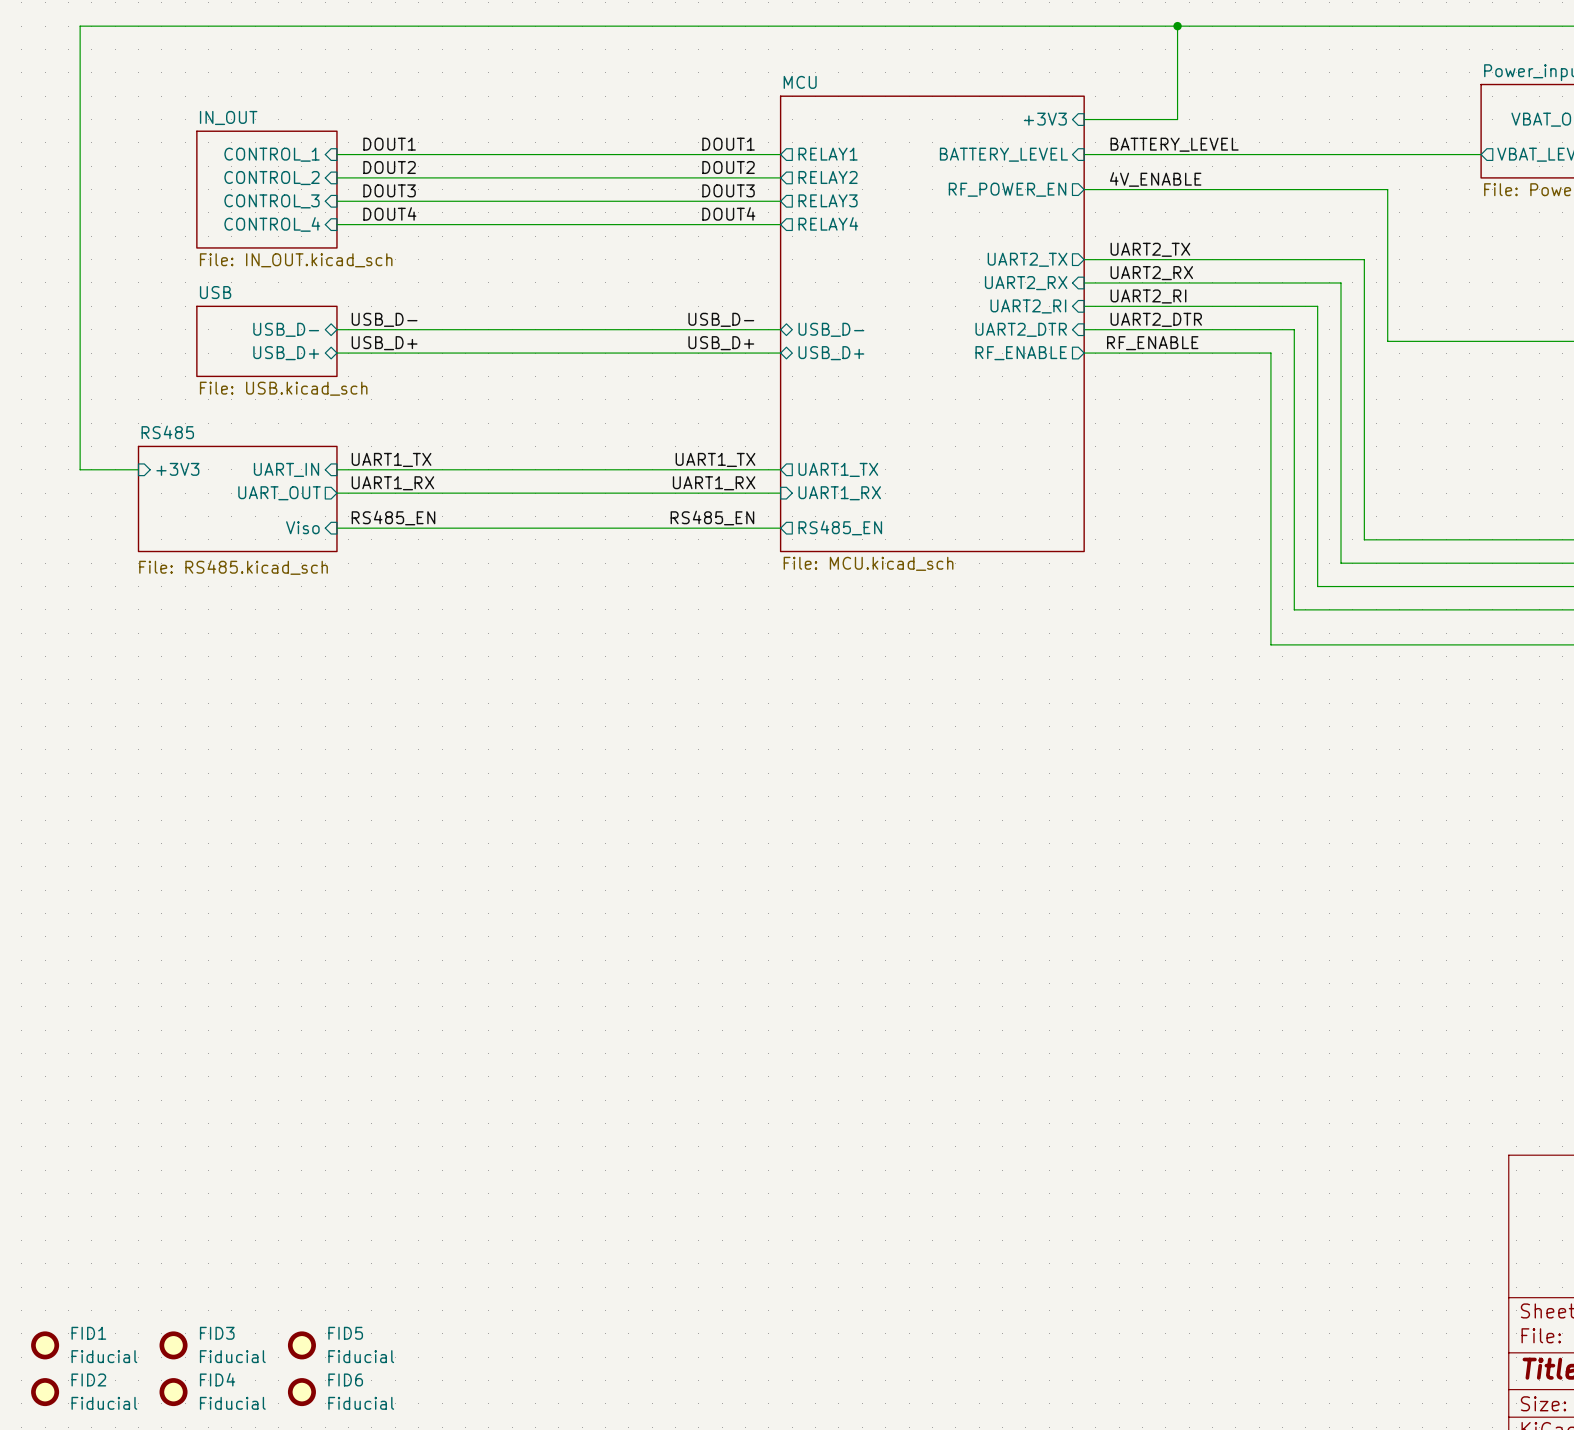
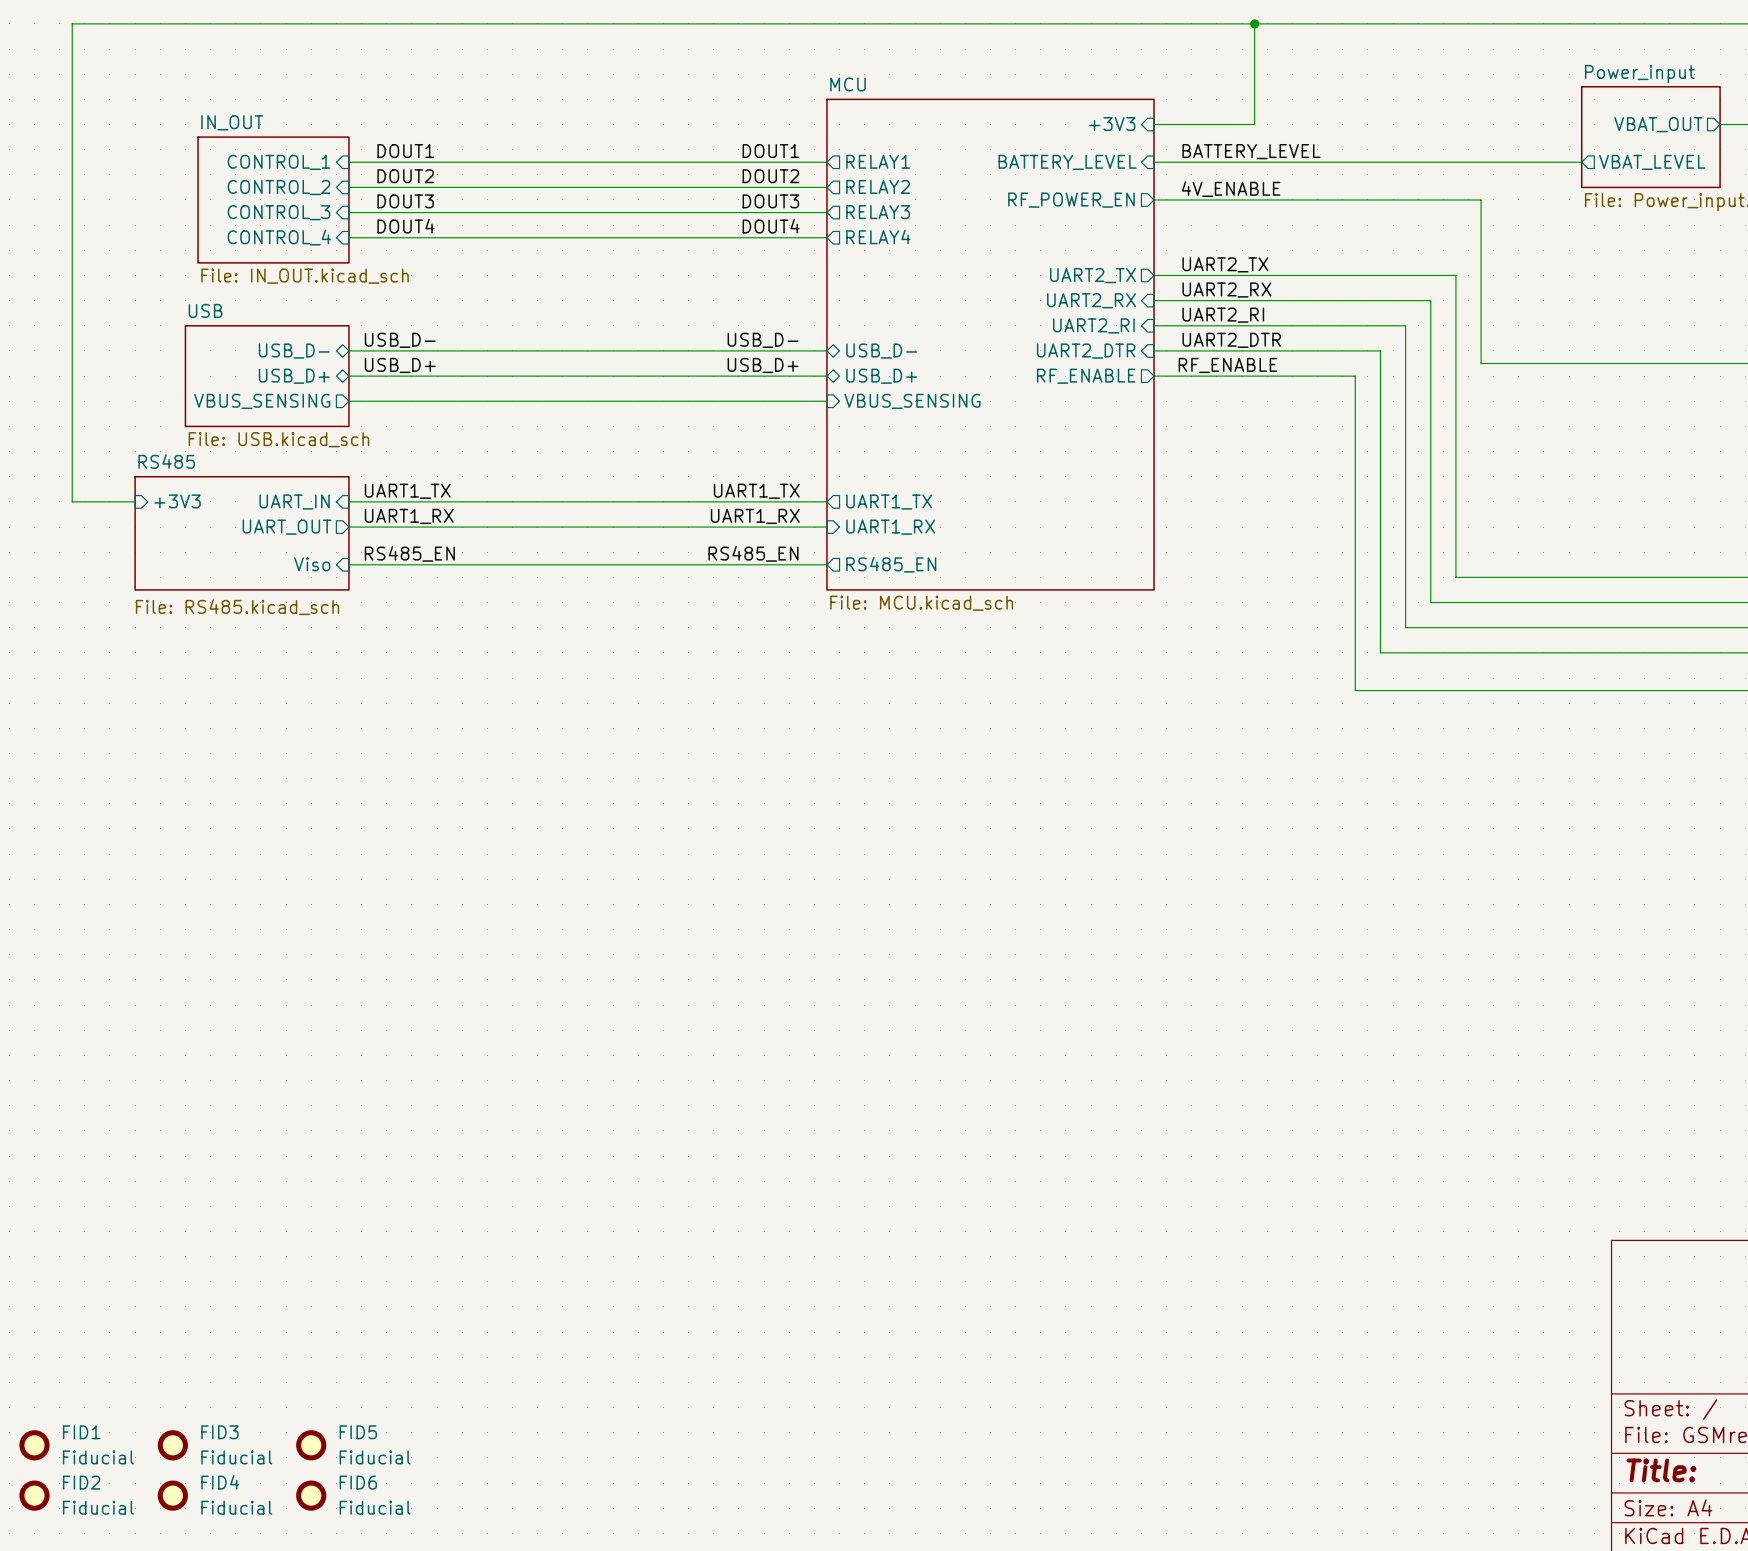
sheet USB: File: USB.kicad_sch (266, 341) -> none
sheet USB: none -> File: USB.kicad_sch (267, 376)
sheet pin: none -> VBUS_SENSING (262, 401)
wire: none -> (348, 401) (826, 401)
sheet pin: none -> VBUS_SENSING (912, 401)

